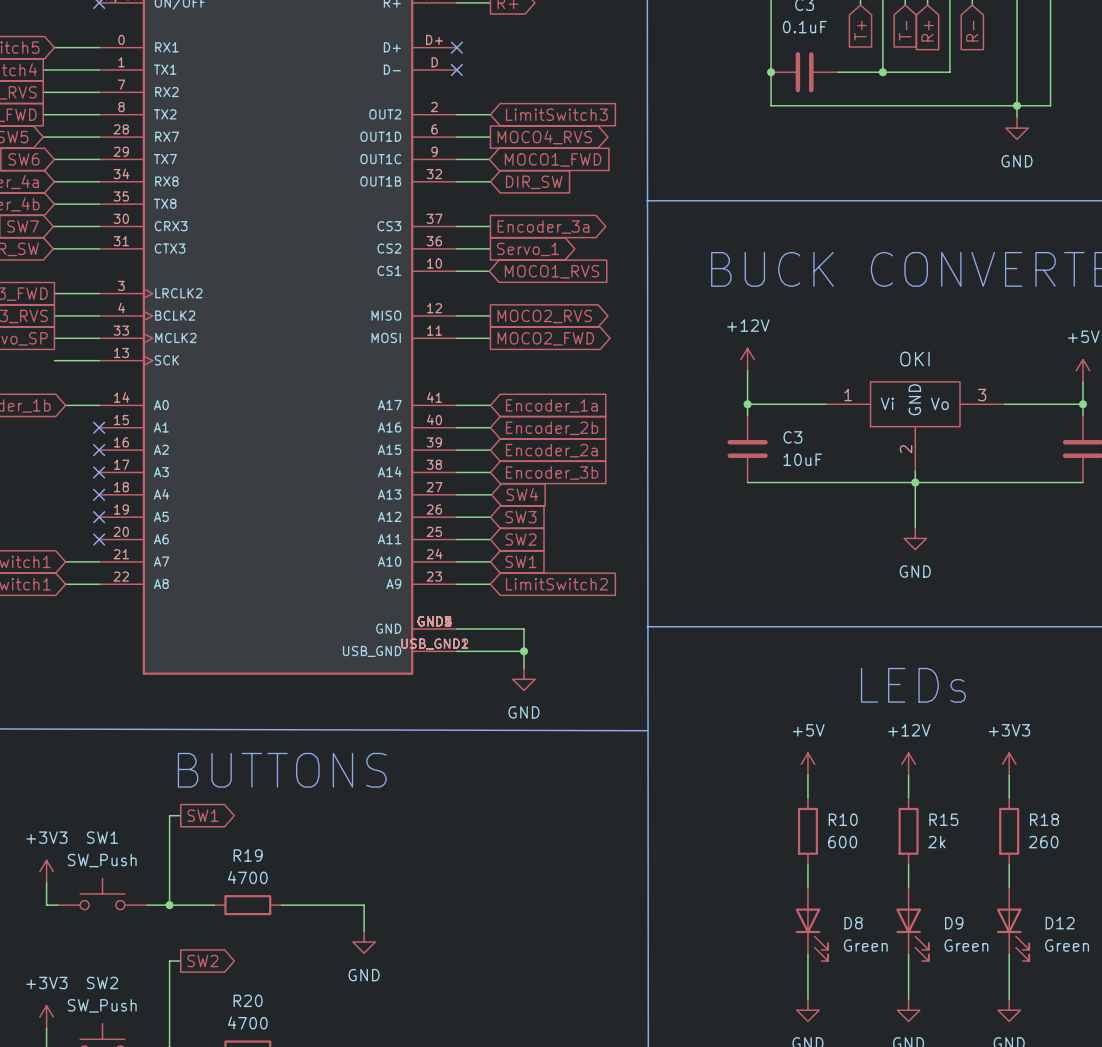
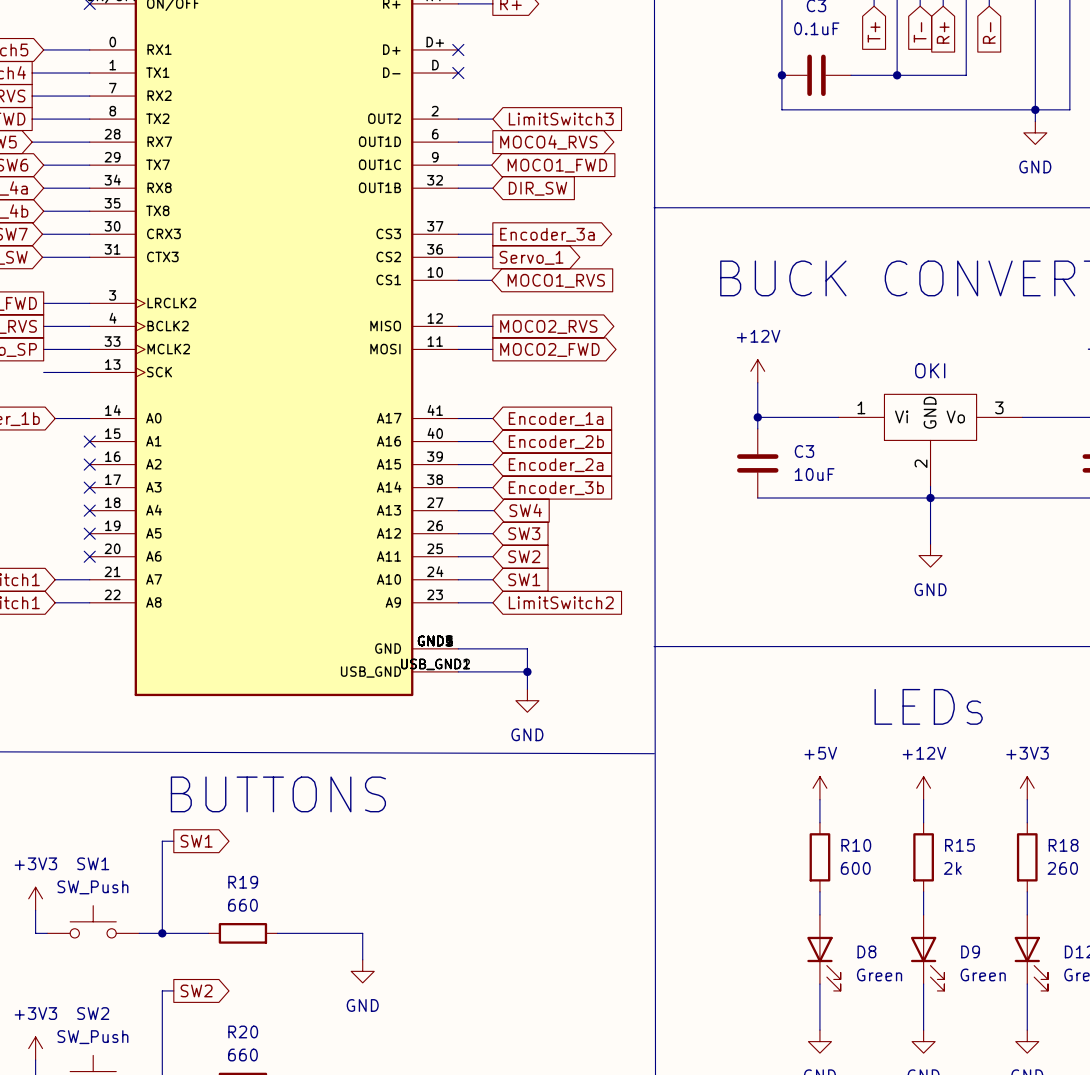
R19 value: 4700 (247, 877) -> 660 (242, 905)
R20 value: 4700 (247, 1022) -> 660 (242, 1055)

